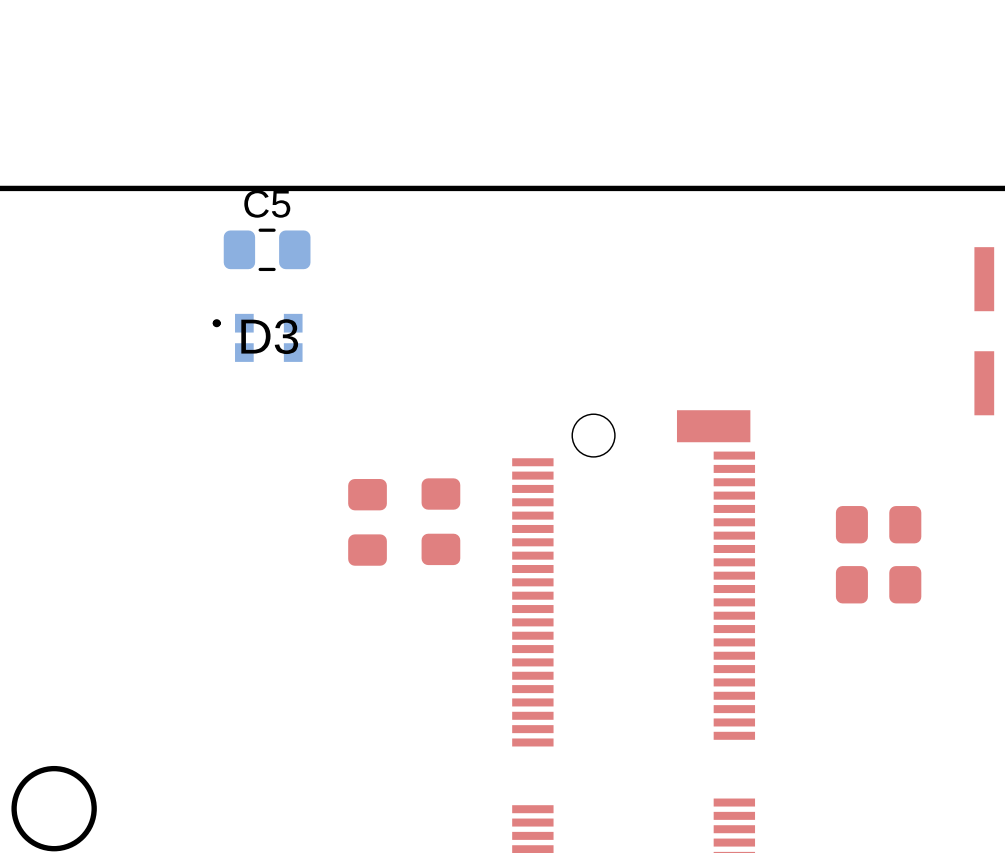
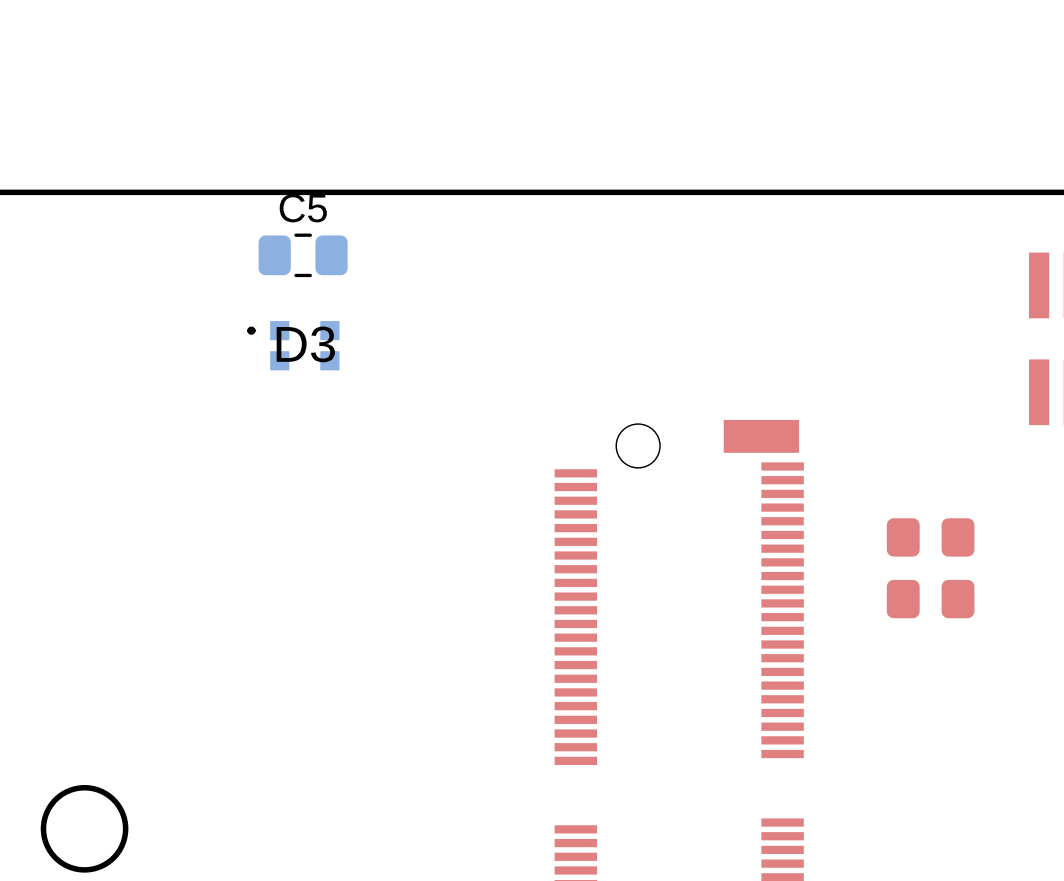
part: (440, 521) -> none
part: (367, 522) -> none

